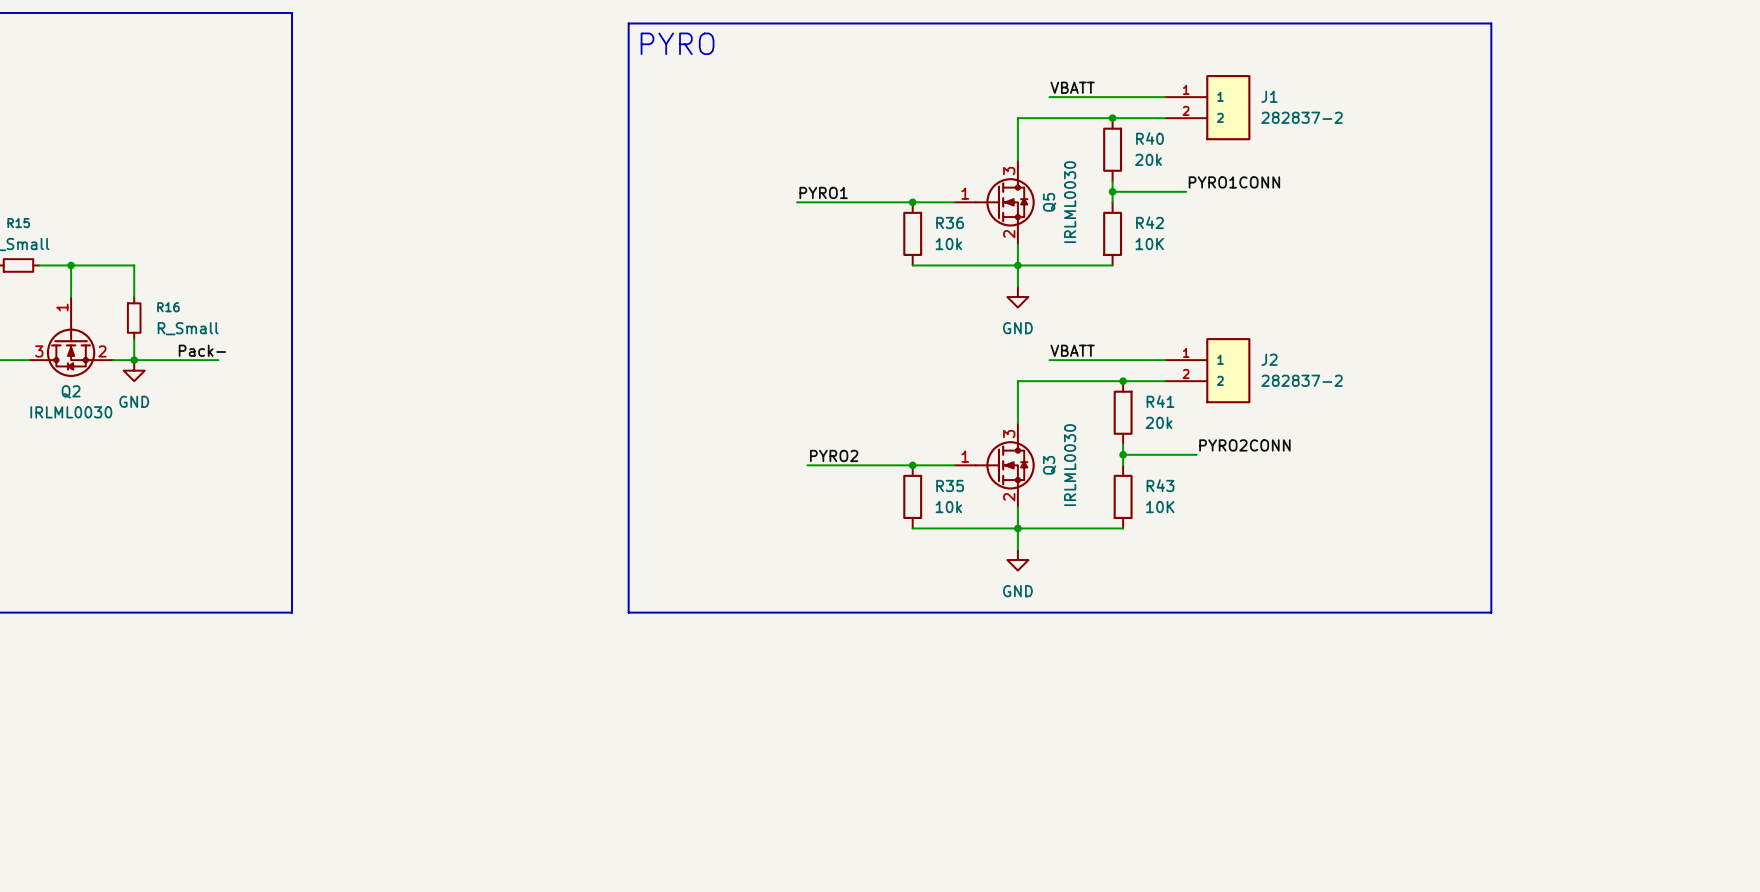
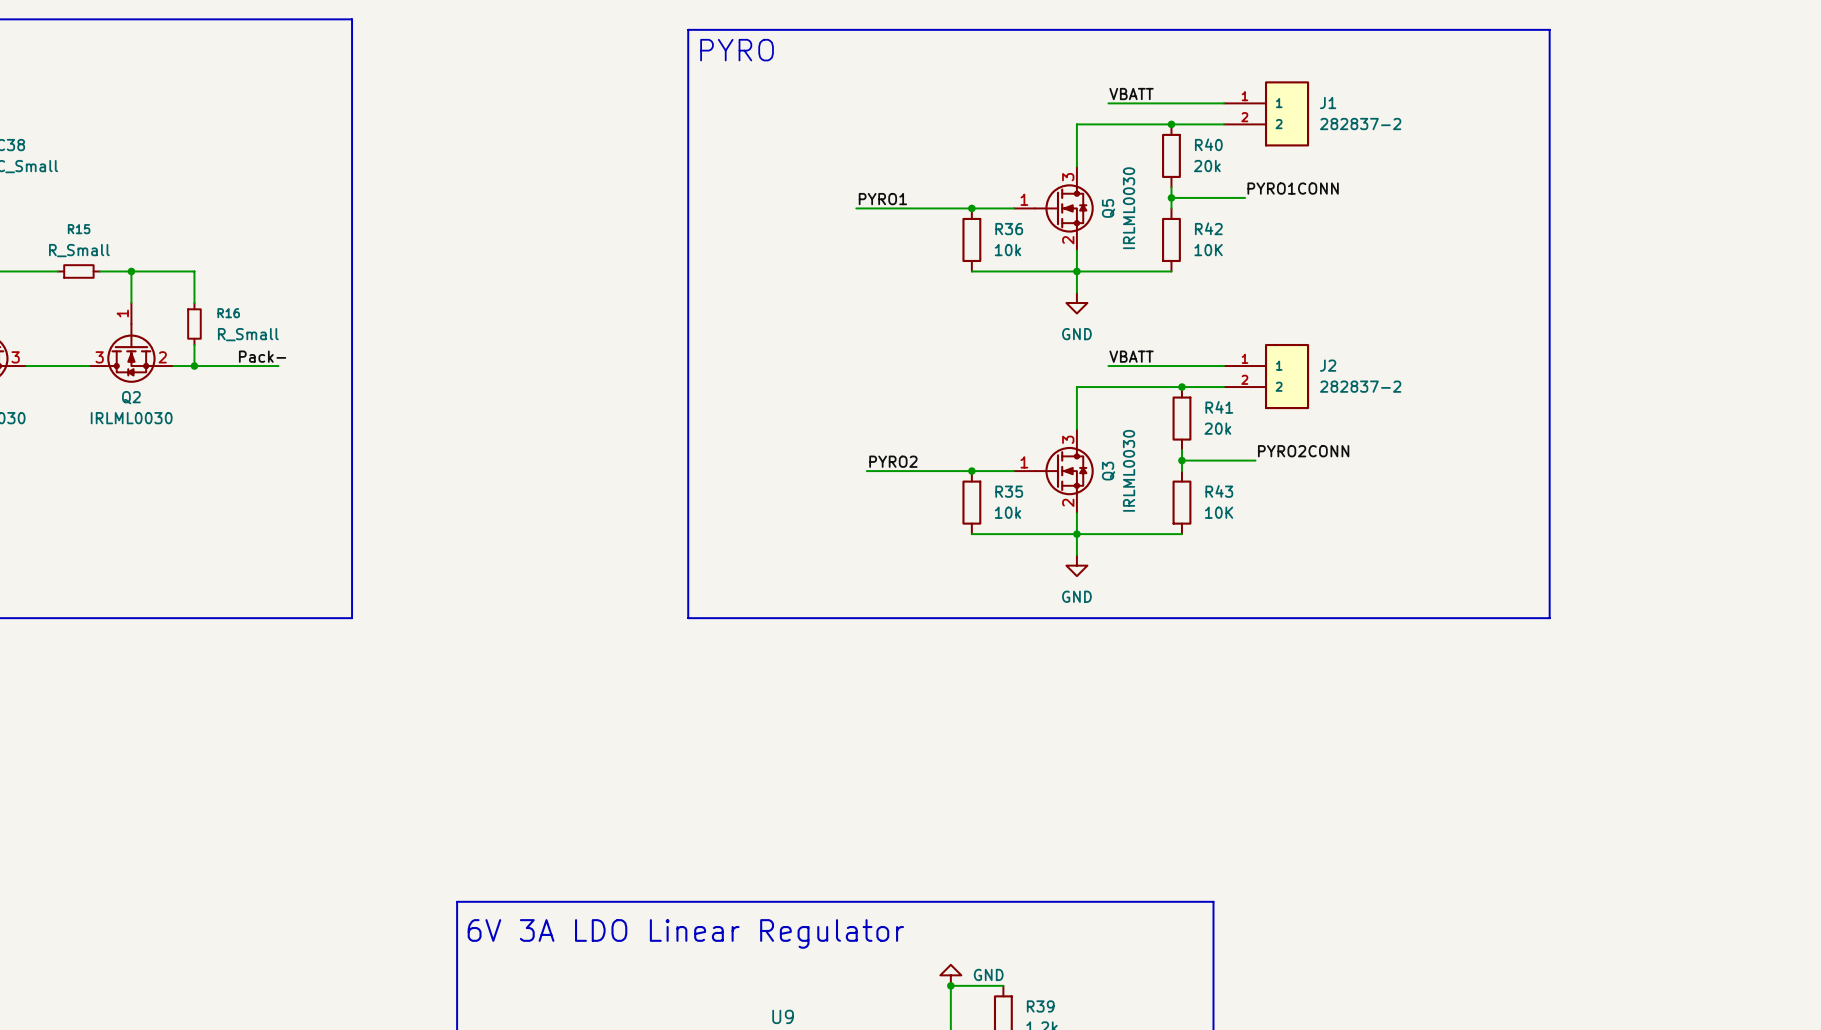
power symbol: GND (134, 370) -> none

